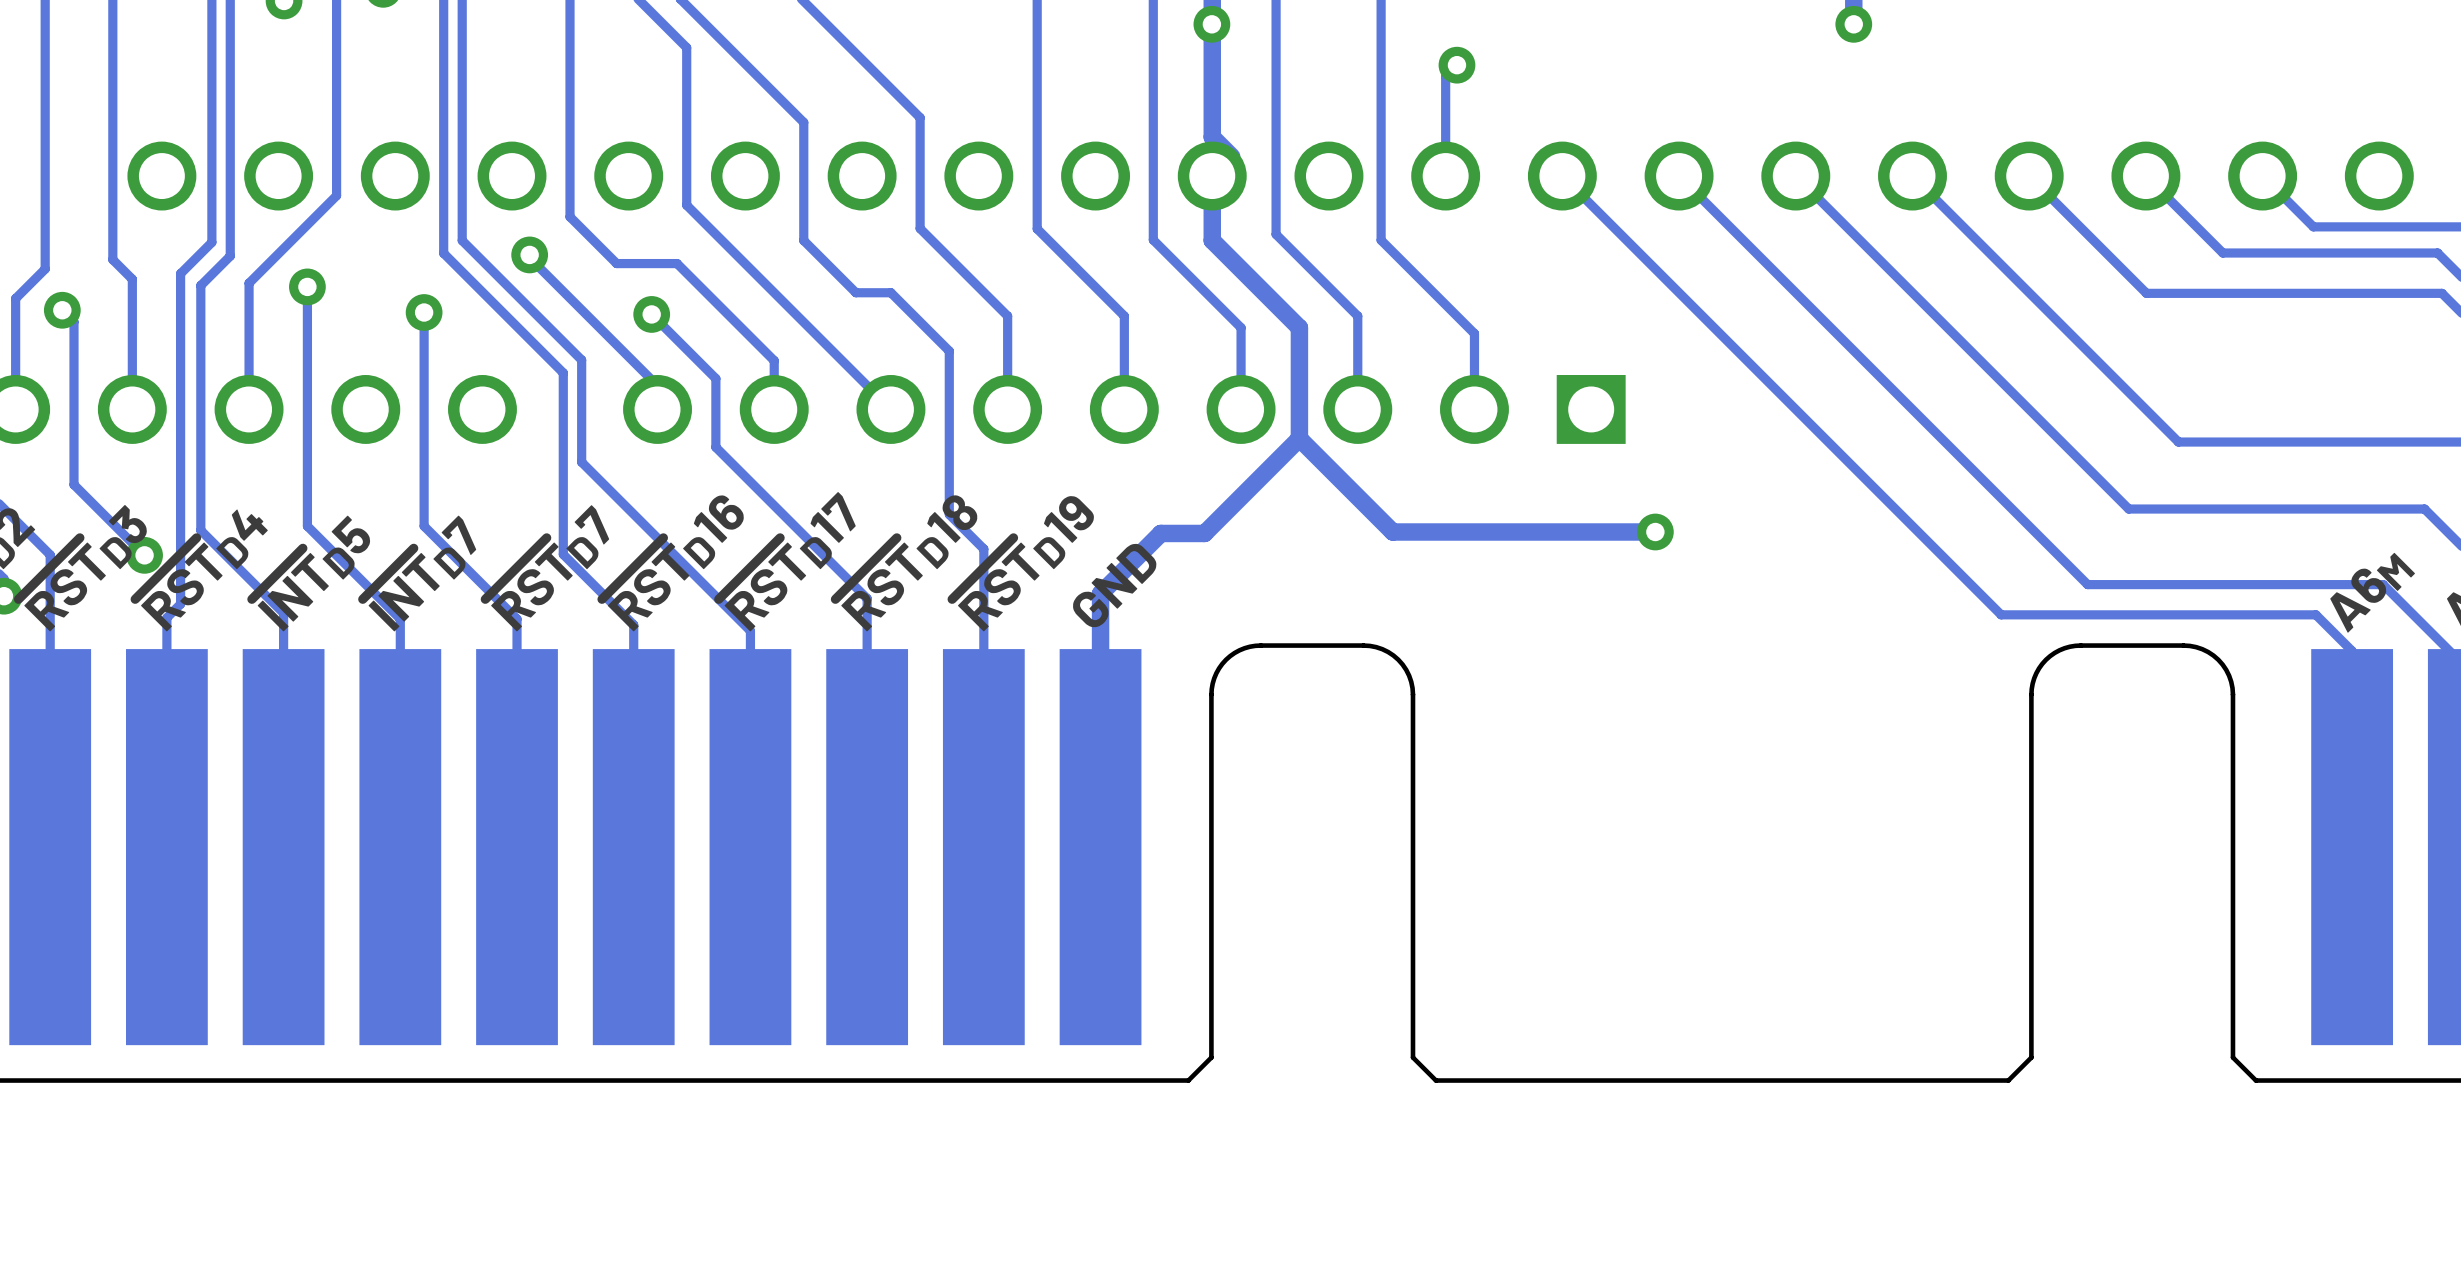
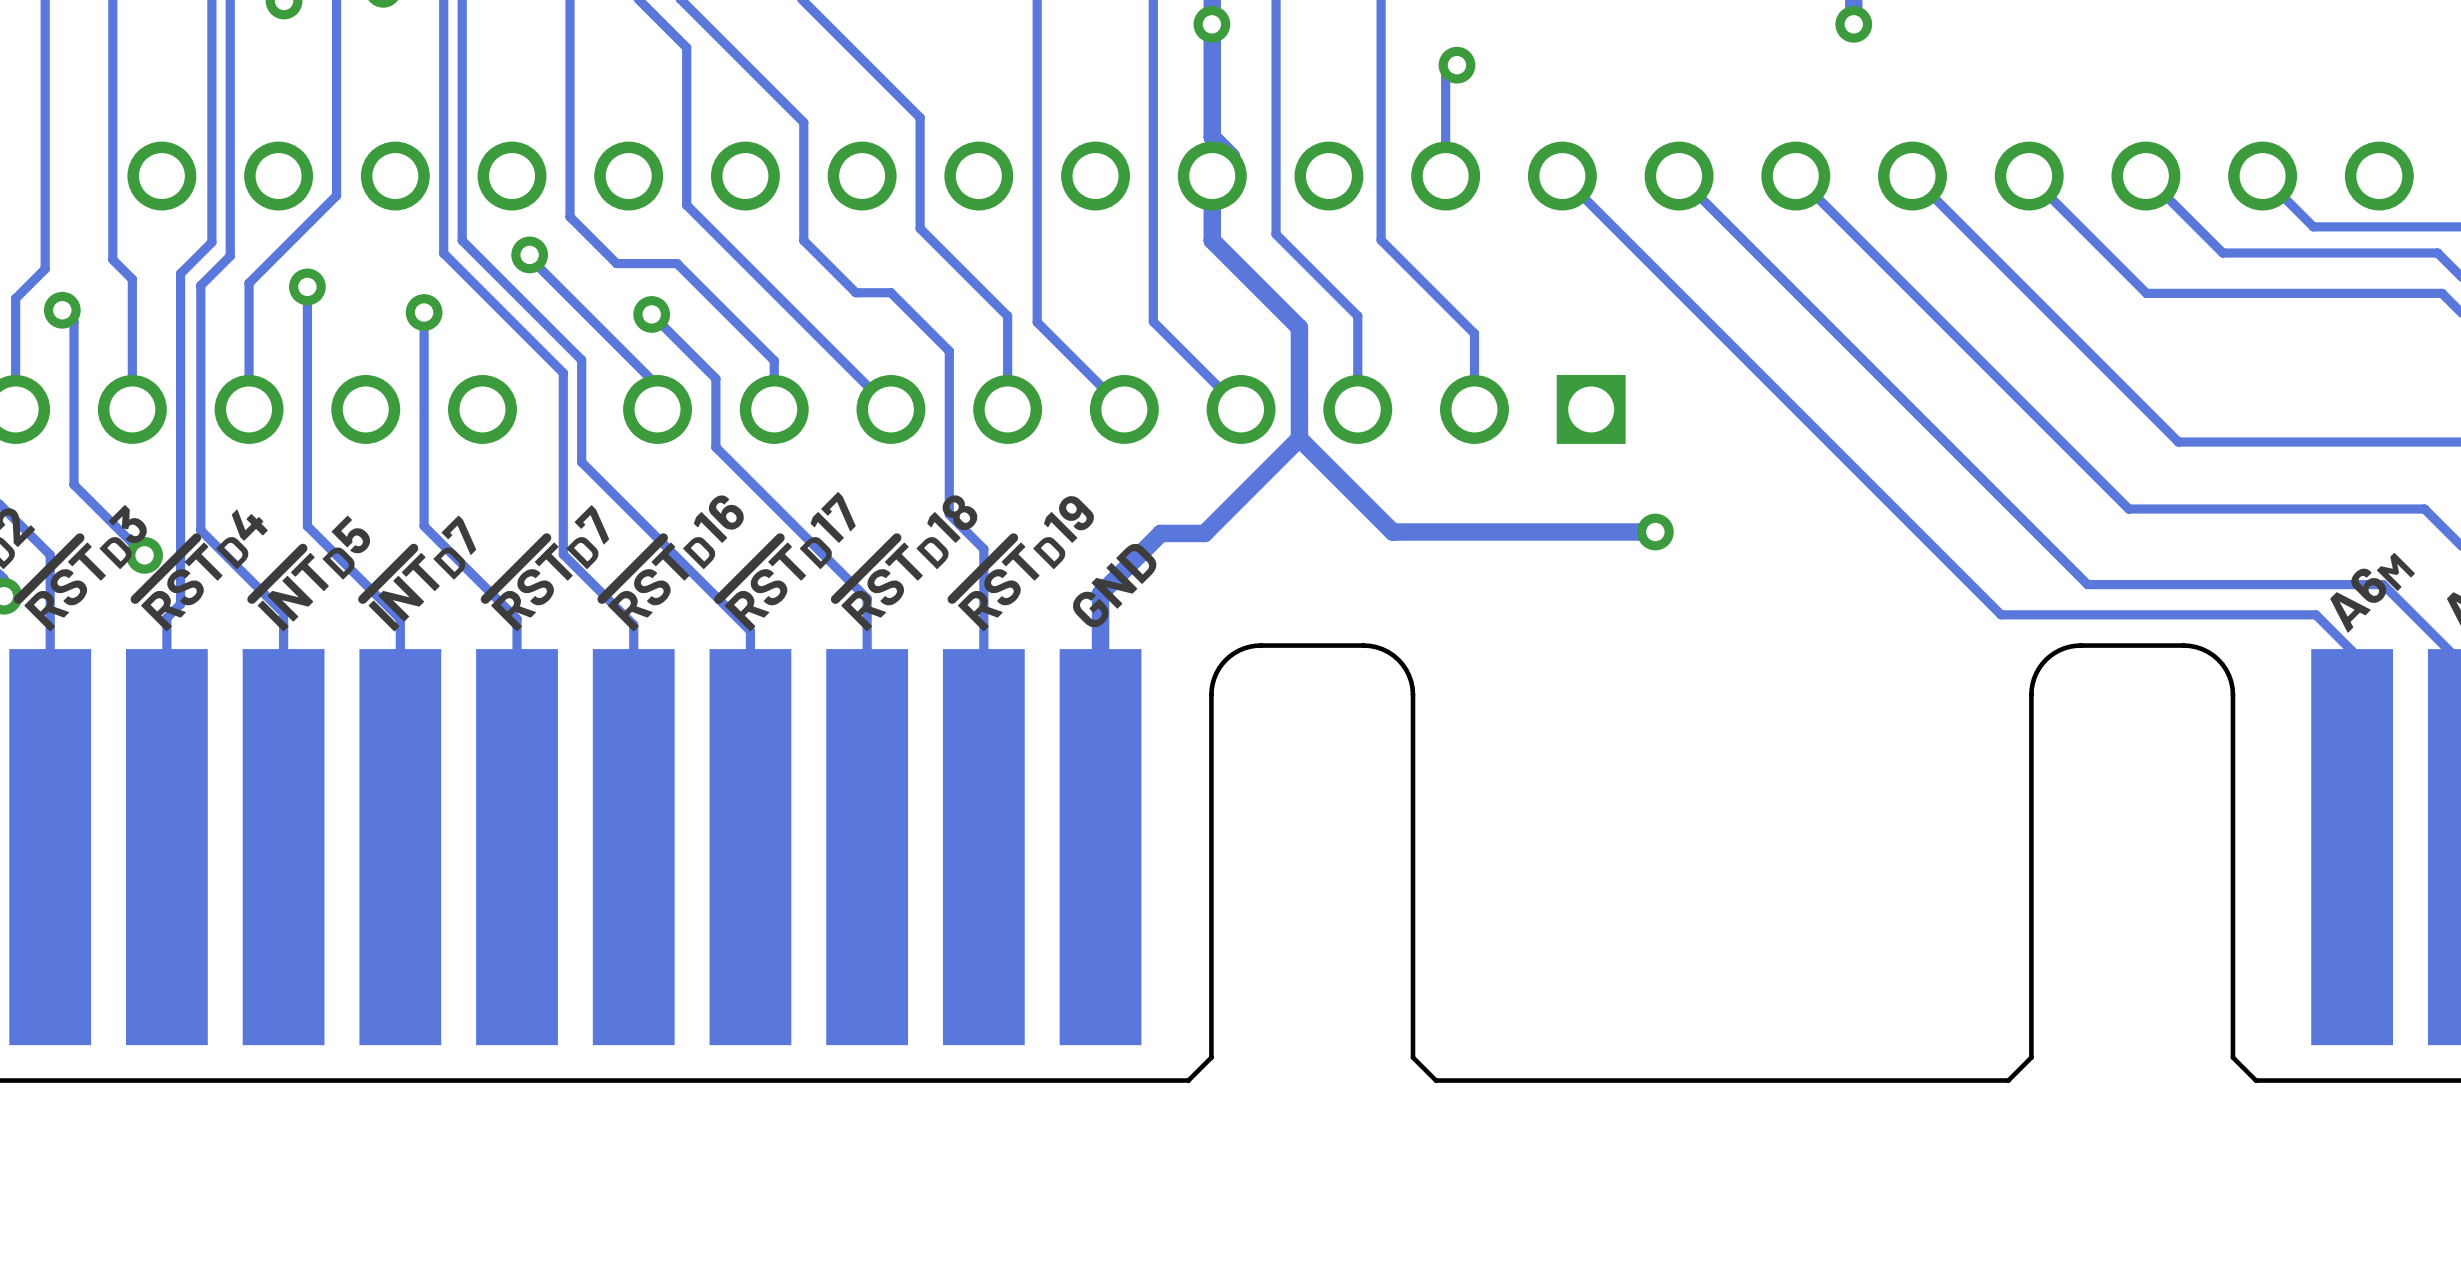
track: (1037, 228) (1124, 316) (1124, 409) -> (1037, 228) (1037, 322) (1124, 409)
track: (1153, 240) (1241, 327) (1241, 409) -> (1153, 240) (1153, 321) (1241, 409)

